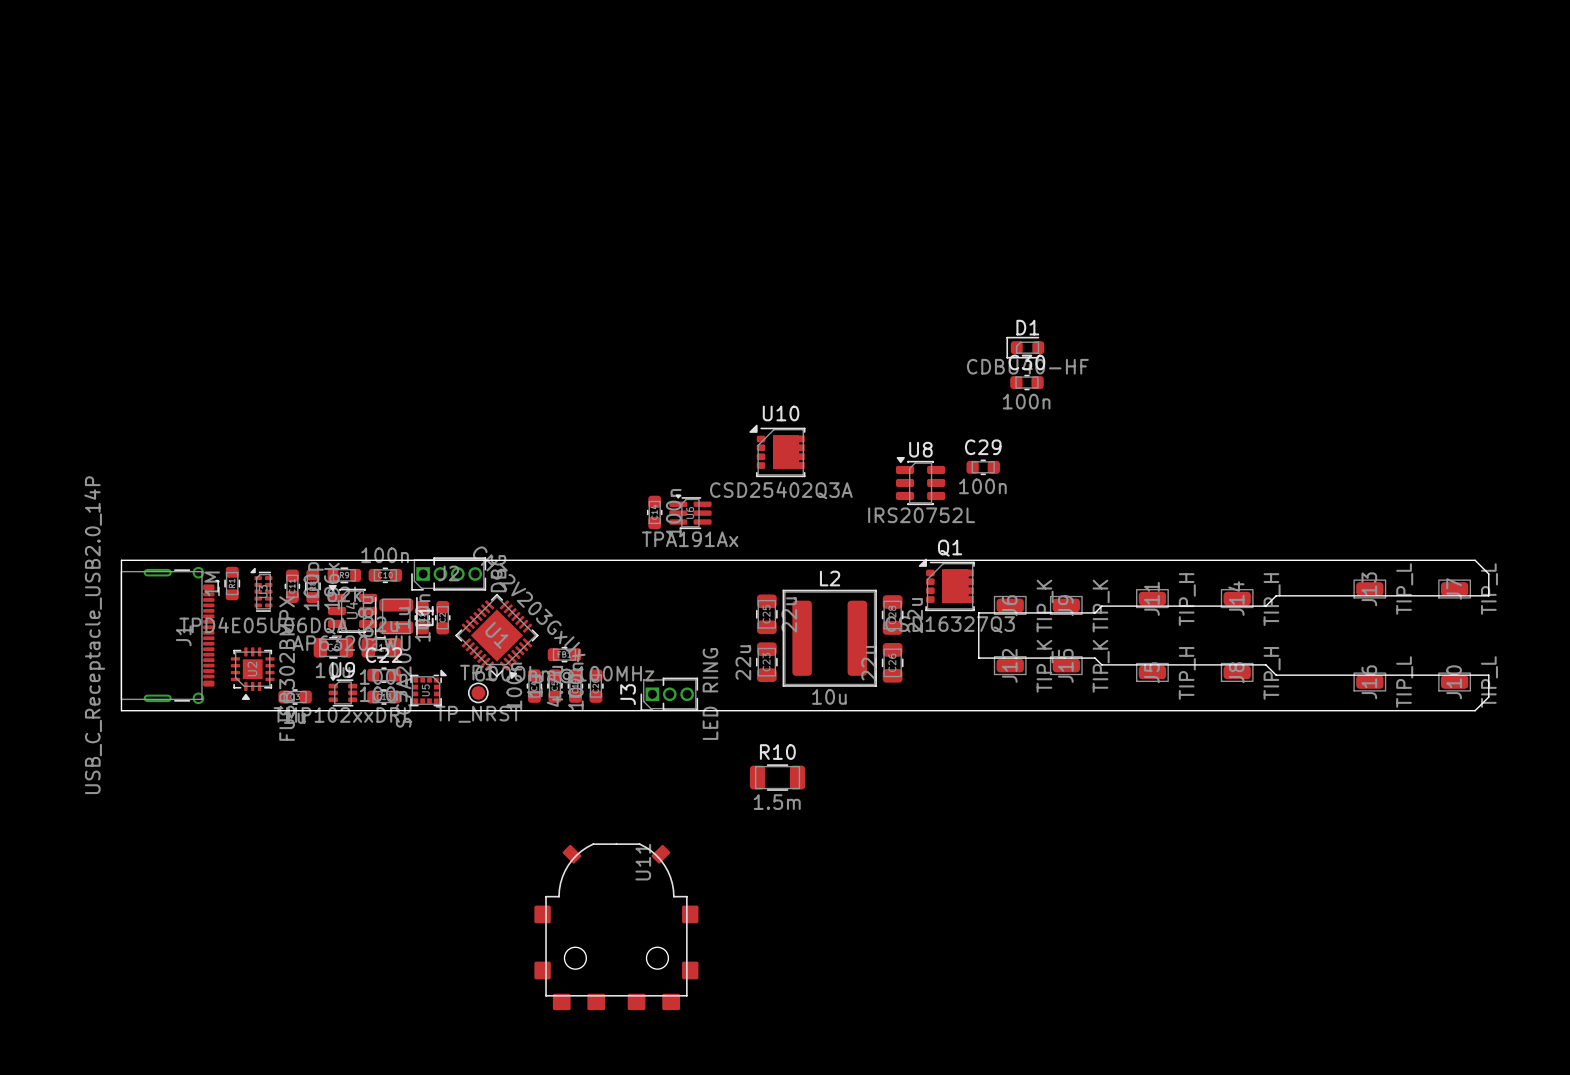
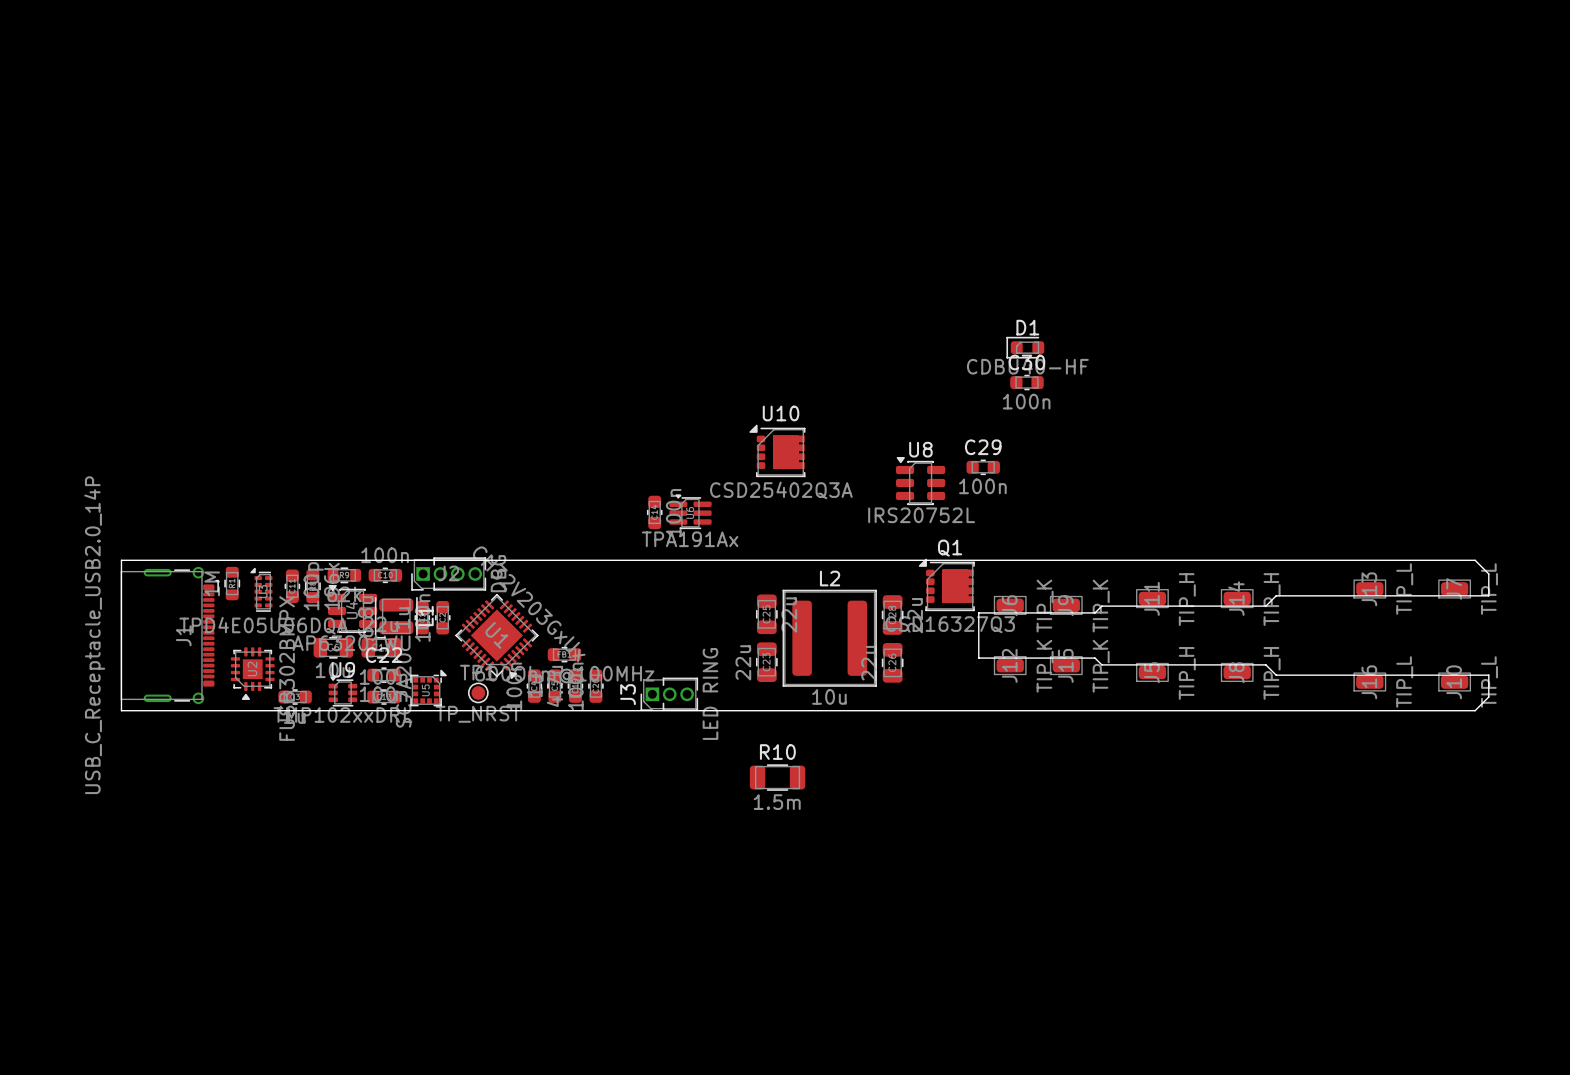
U11: (616, 926) -> none

